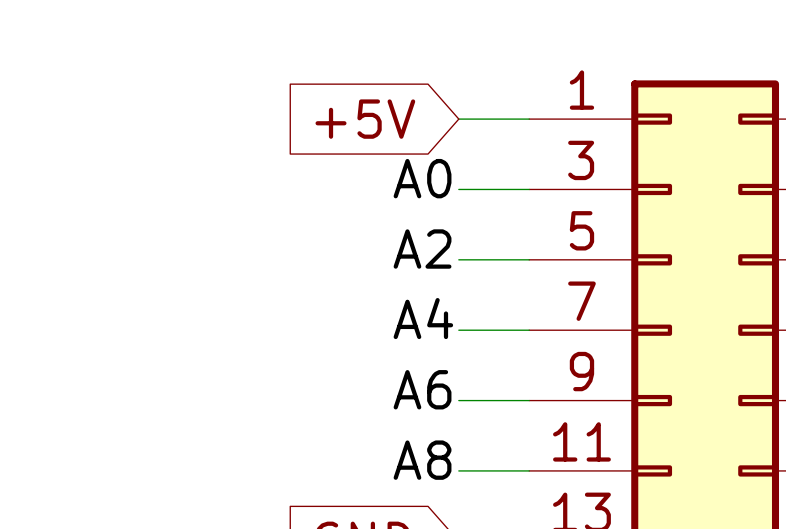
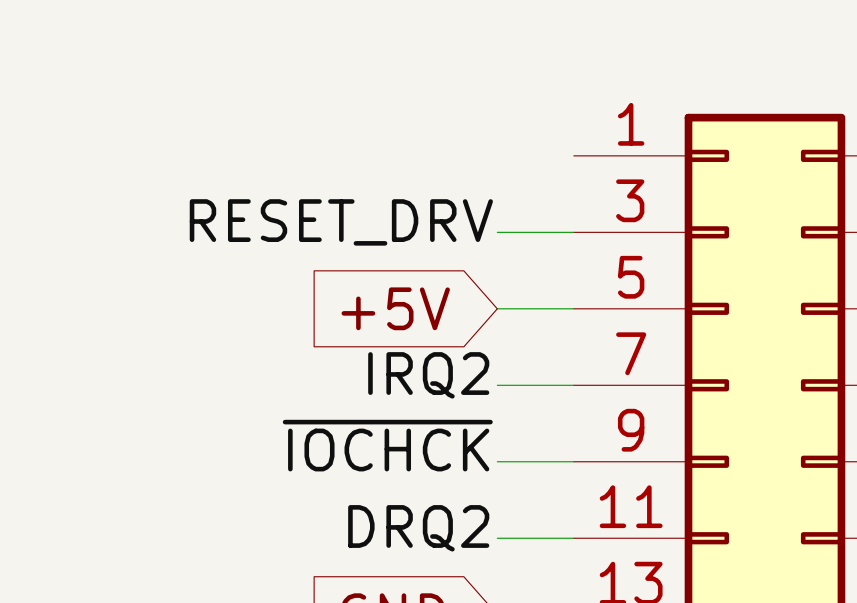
global label position: +5V (365, 119) -> +5V (395, 308)
wire: (458, 119) (529, 119) -> none
label: A0 (422, 178) -> RESET_DRV (341, 222)
label: A2 (422, 249) -> none
label: A4 (423, 318) -> IRQ2 (428, 375)
label: A6 (422, 389) -> ~{IOCHCK} (387, 445)
label: A8 (422, 460) -> DRQ2 (418, 528)

